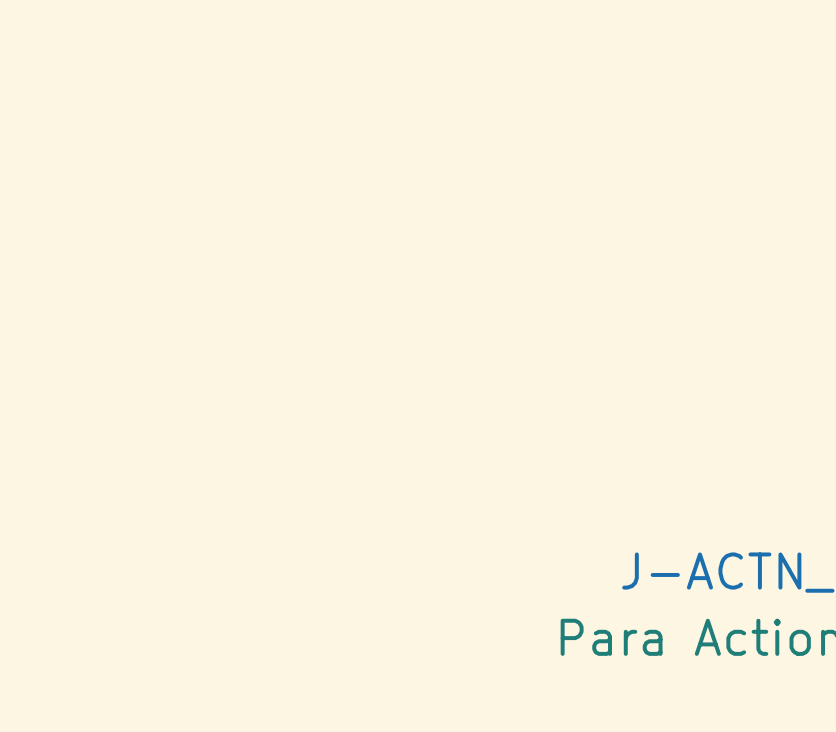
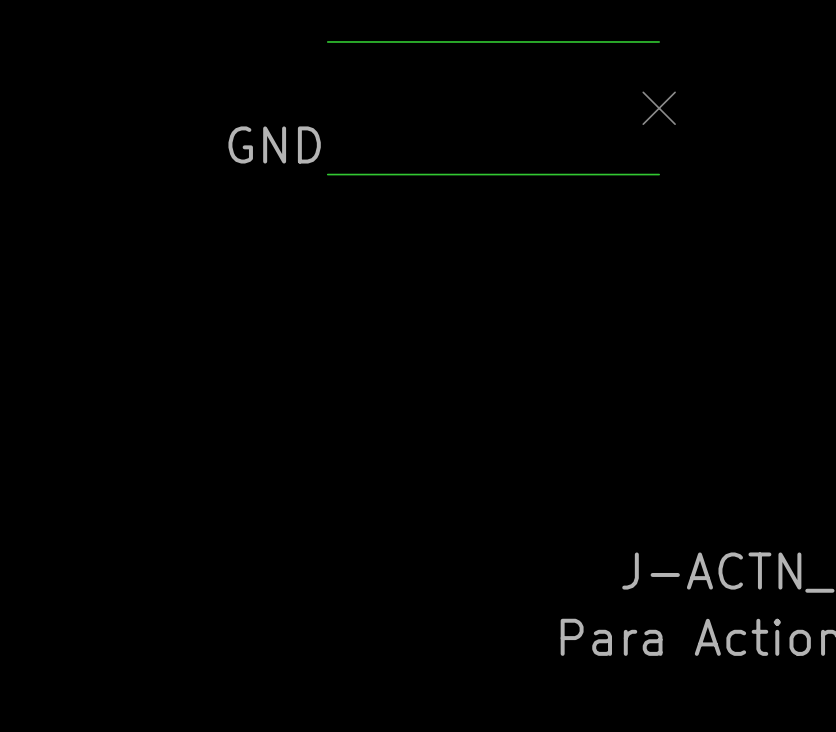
wire: none -> (327, 41) (659, 41)
no-connect mark: none -> (659, 108)
label: none -> GND (274, 144)
wire: none -> (327, 174) (659, 174)

